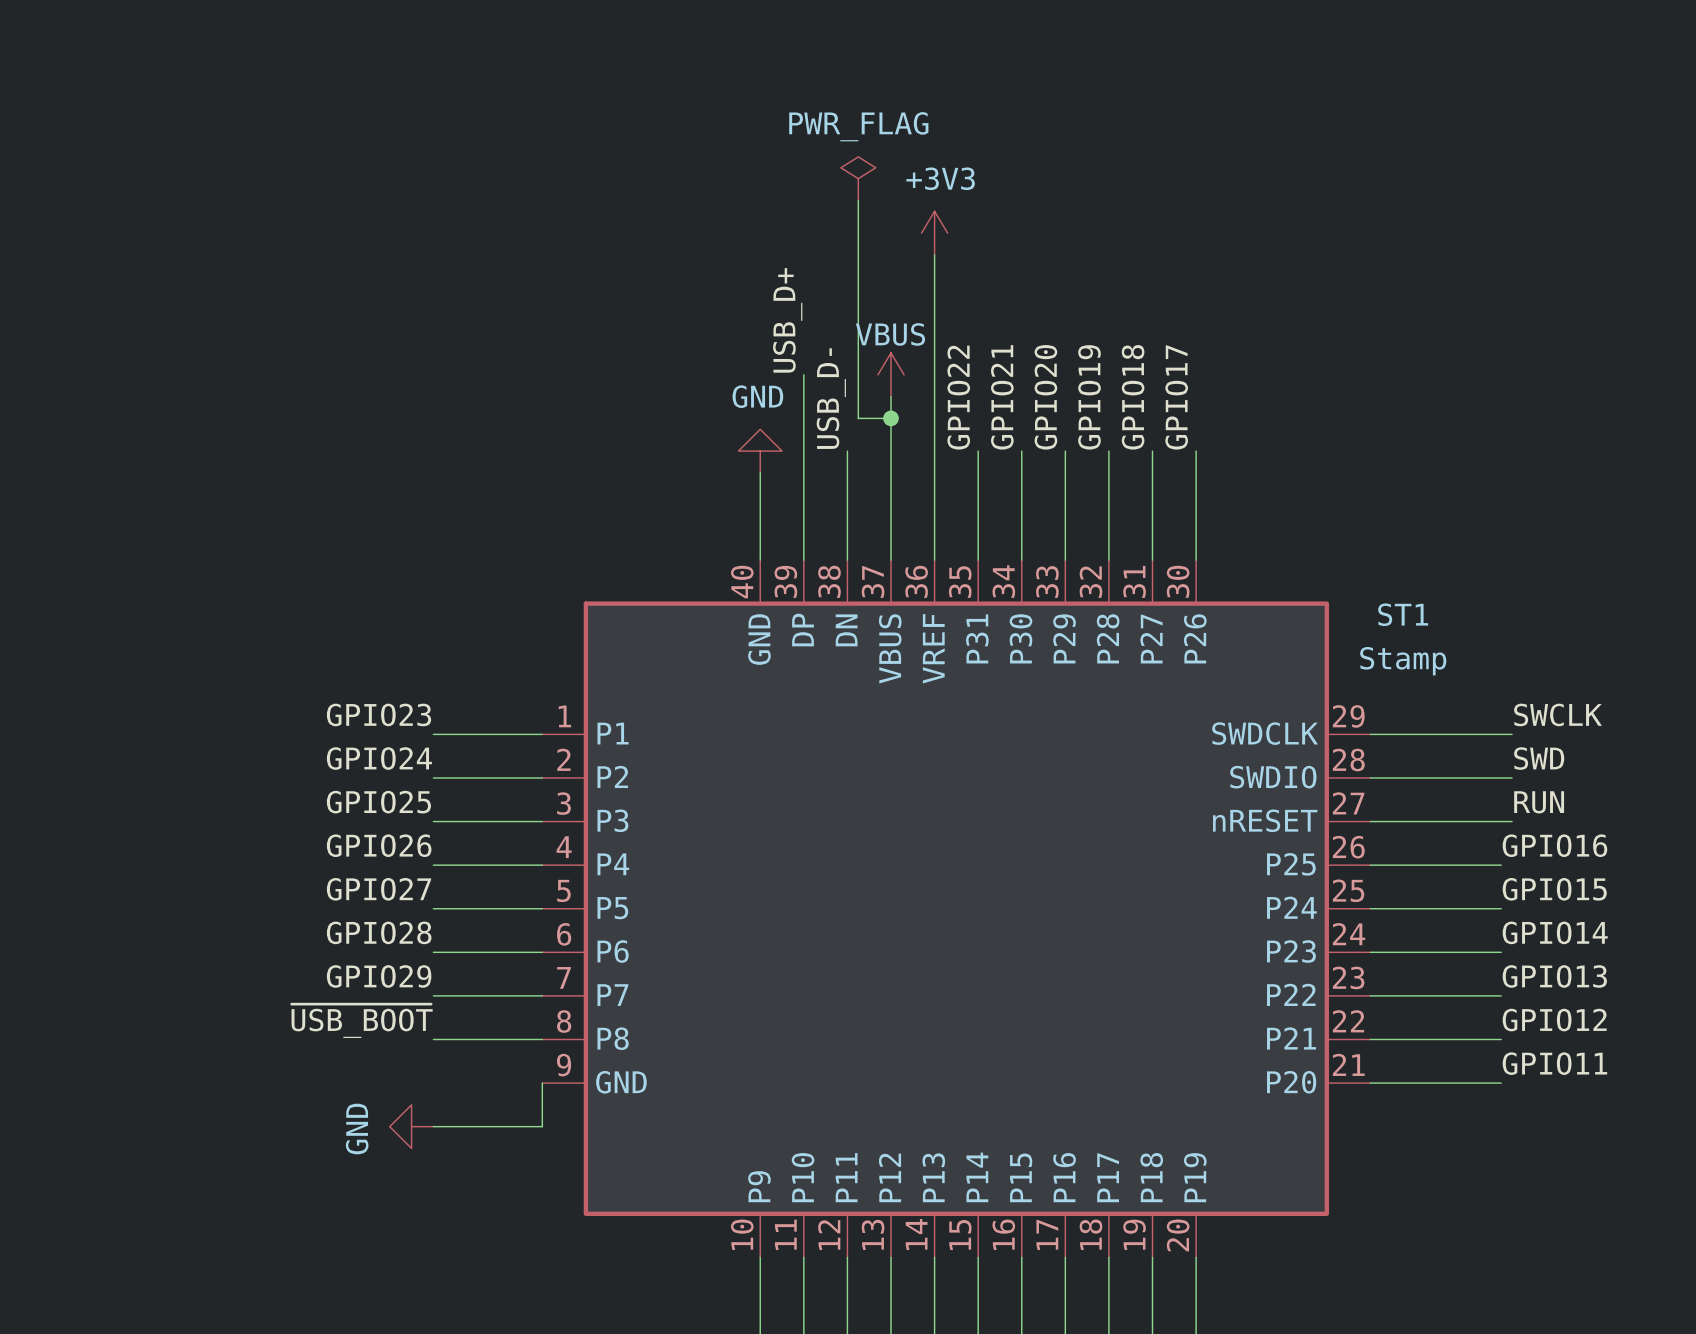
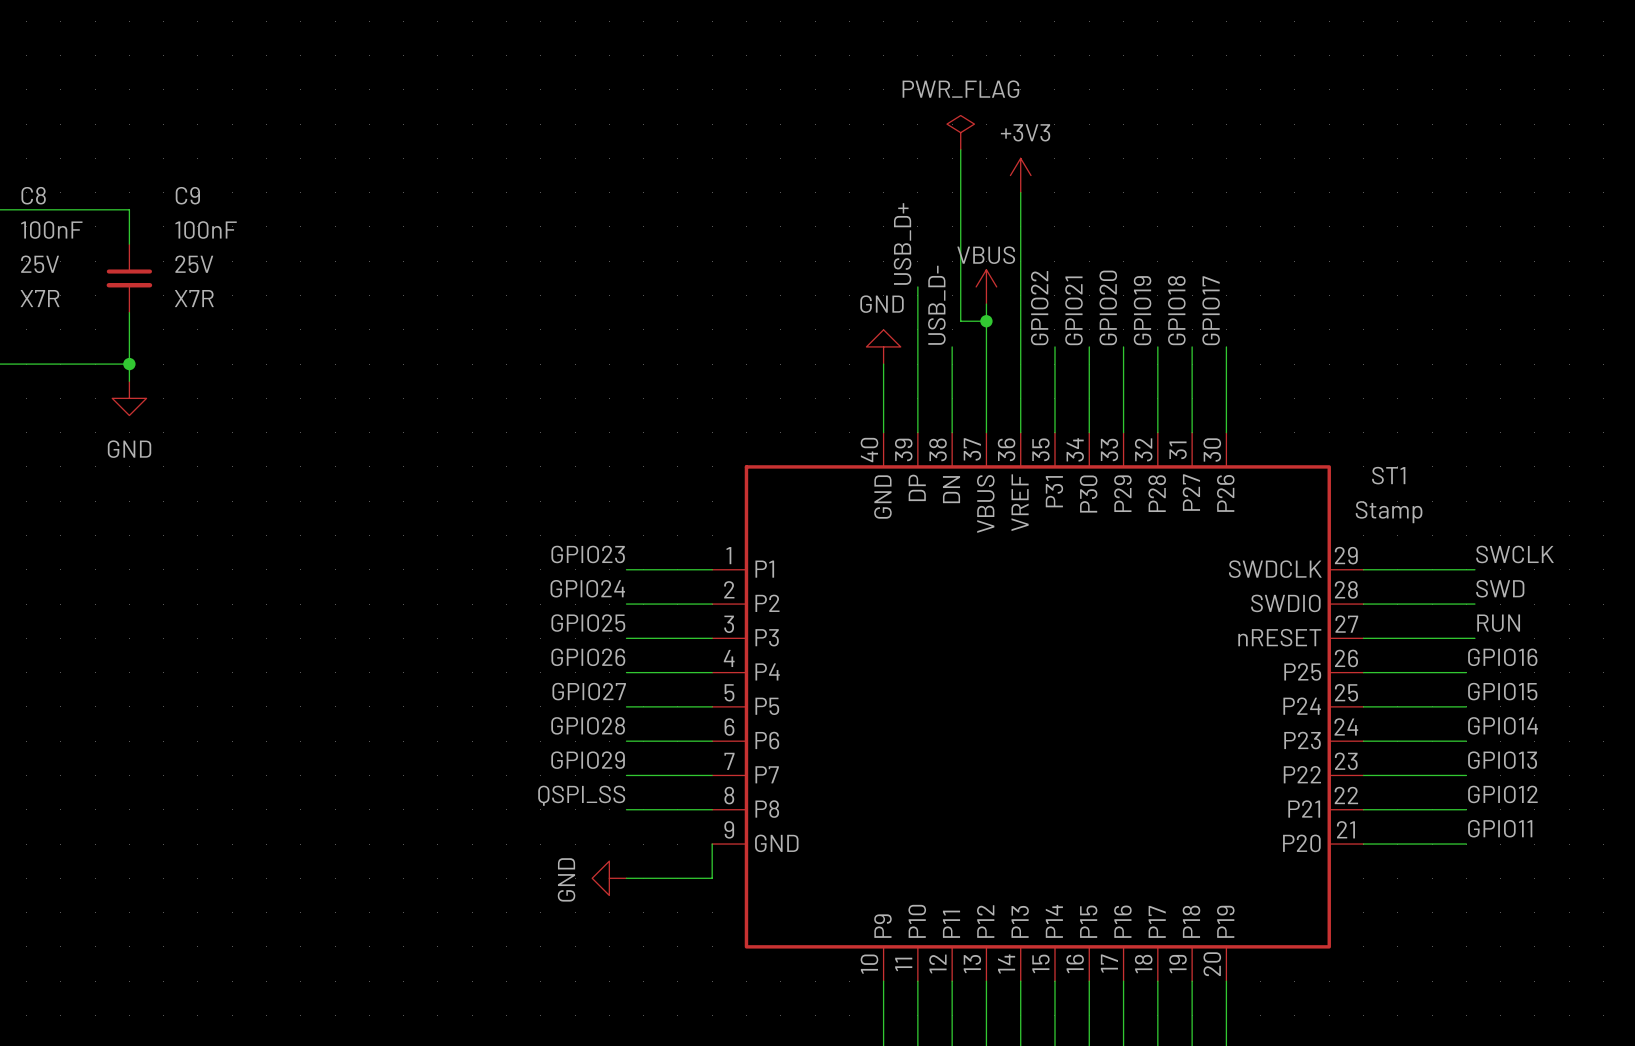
label: ~{USB_BOOT} (362, 1021) -> QSPI_SS (581, 795)

